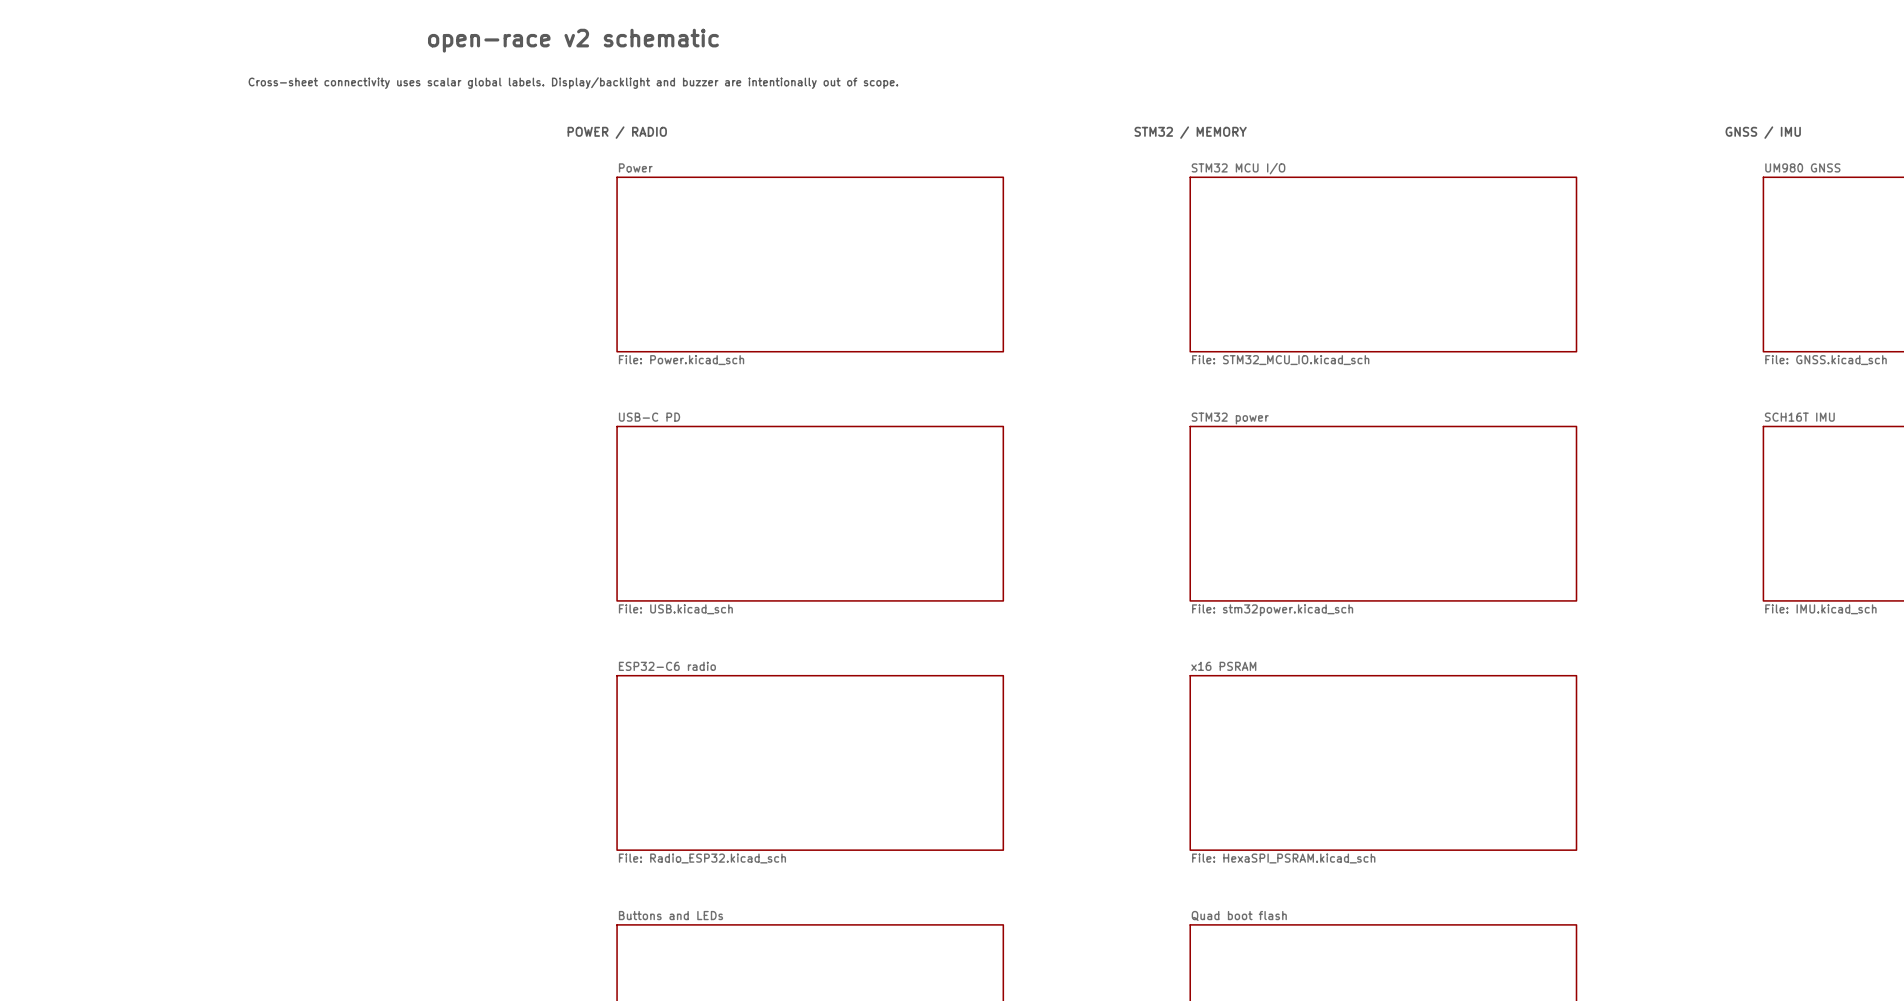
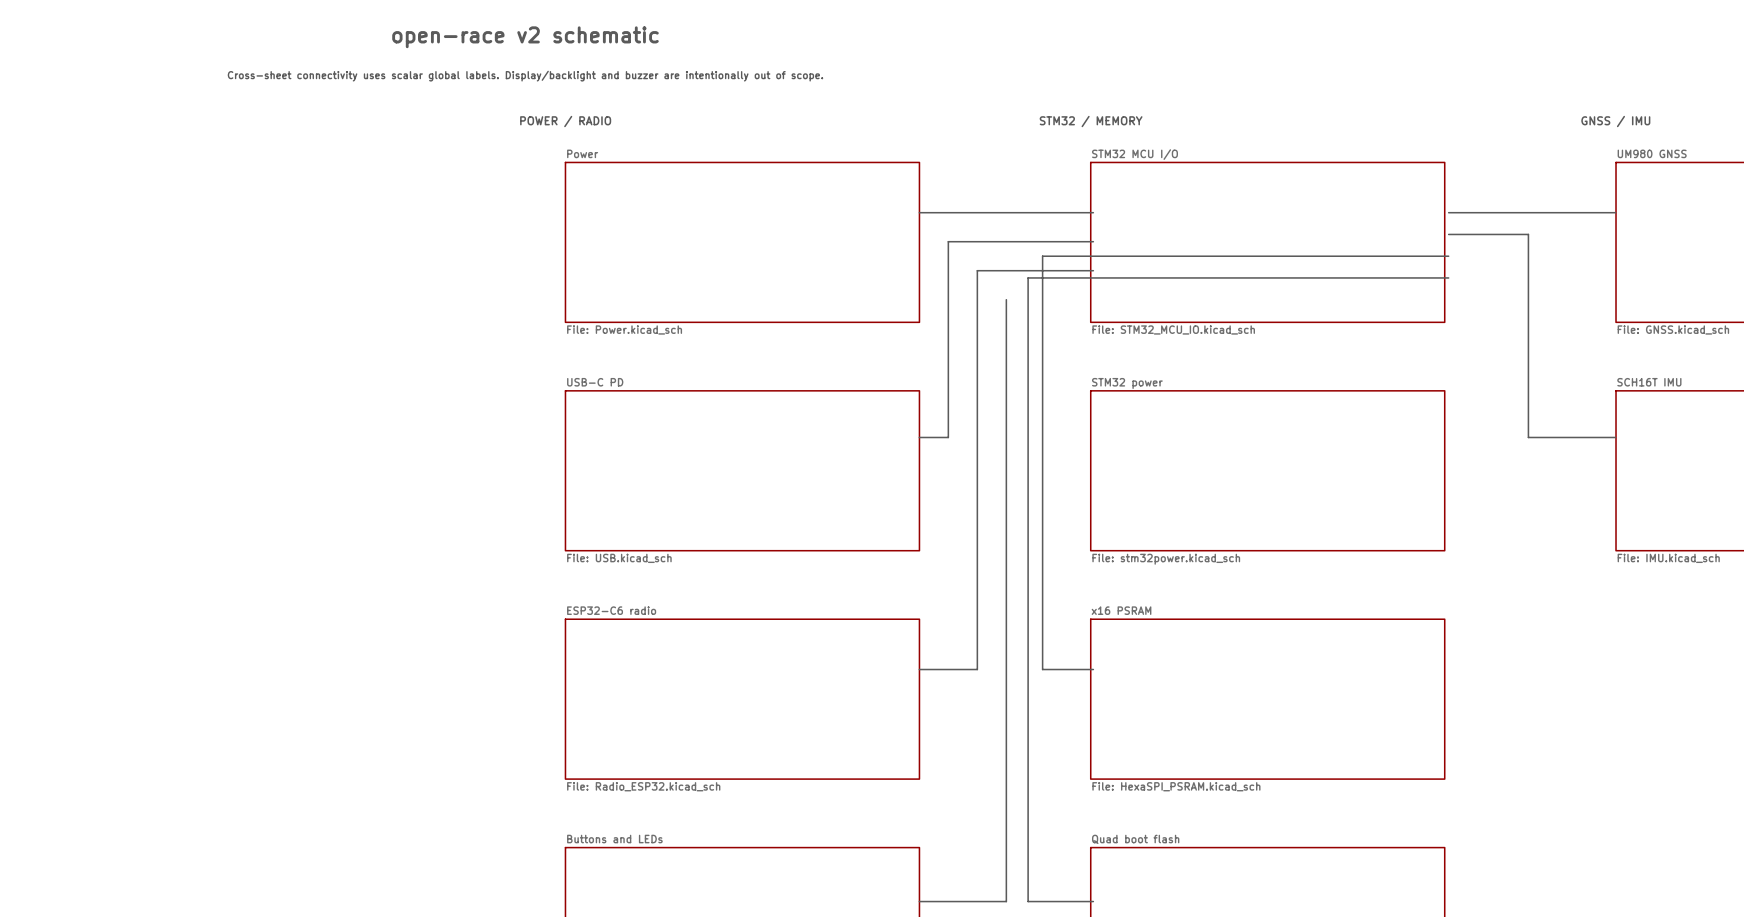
bus: none -> (919, 212) (1093, 212)
bus: none -> (1448, 212) (1615, 212)
bus: none -> (1448, 234) (1528, 234) (1528, 437) (1615, 437)
bus: none -> (1093, 241) (948, 241) (948, 437) (919, 437)
bus: none -> (1448, 256) (1042, 256) (1042, 669) (1093, 669)
bus: none -> (1093, 270) (977, 270) (977, 669) (919, 669)
bus: none -> (1448, 277) (1028, 277) (1028, 901) (1093, 901)
bus: none -> (1006, 299) (1006, 901) (919, 901)

